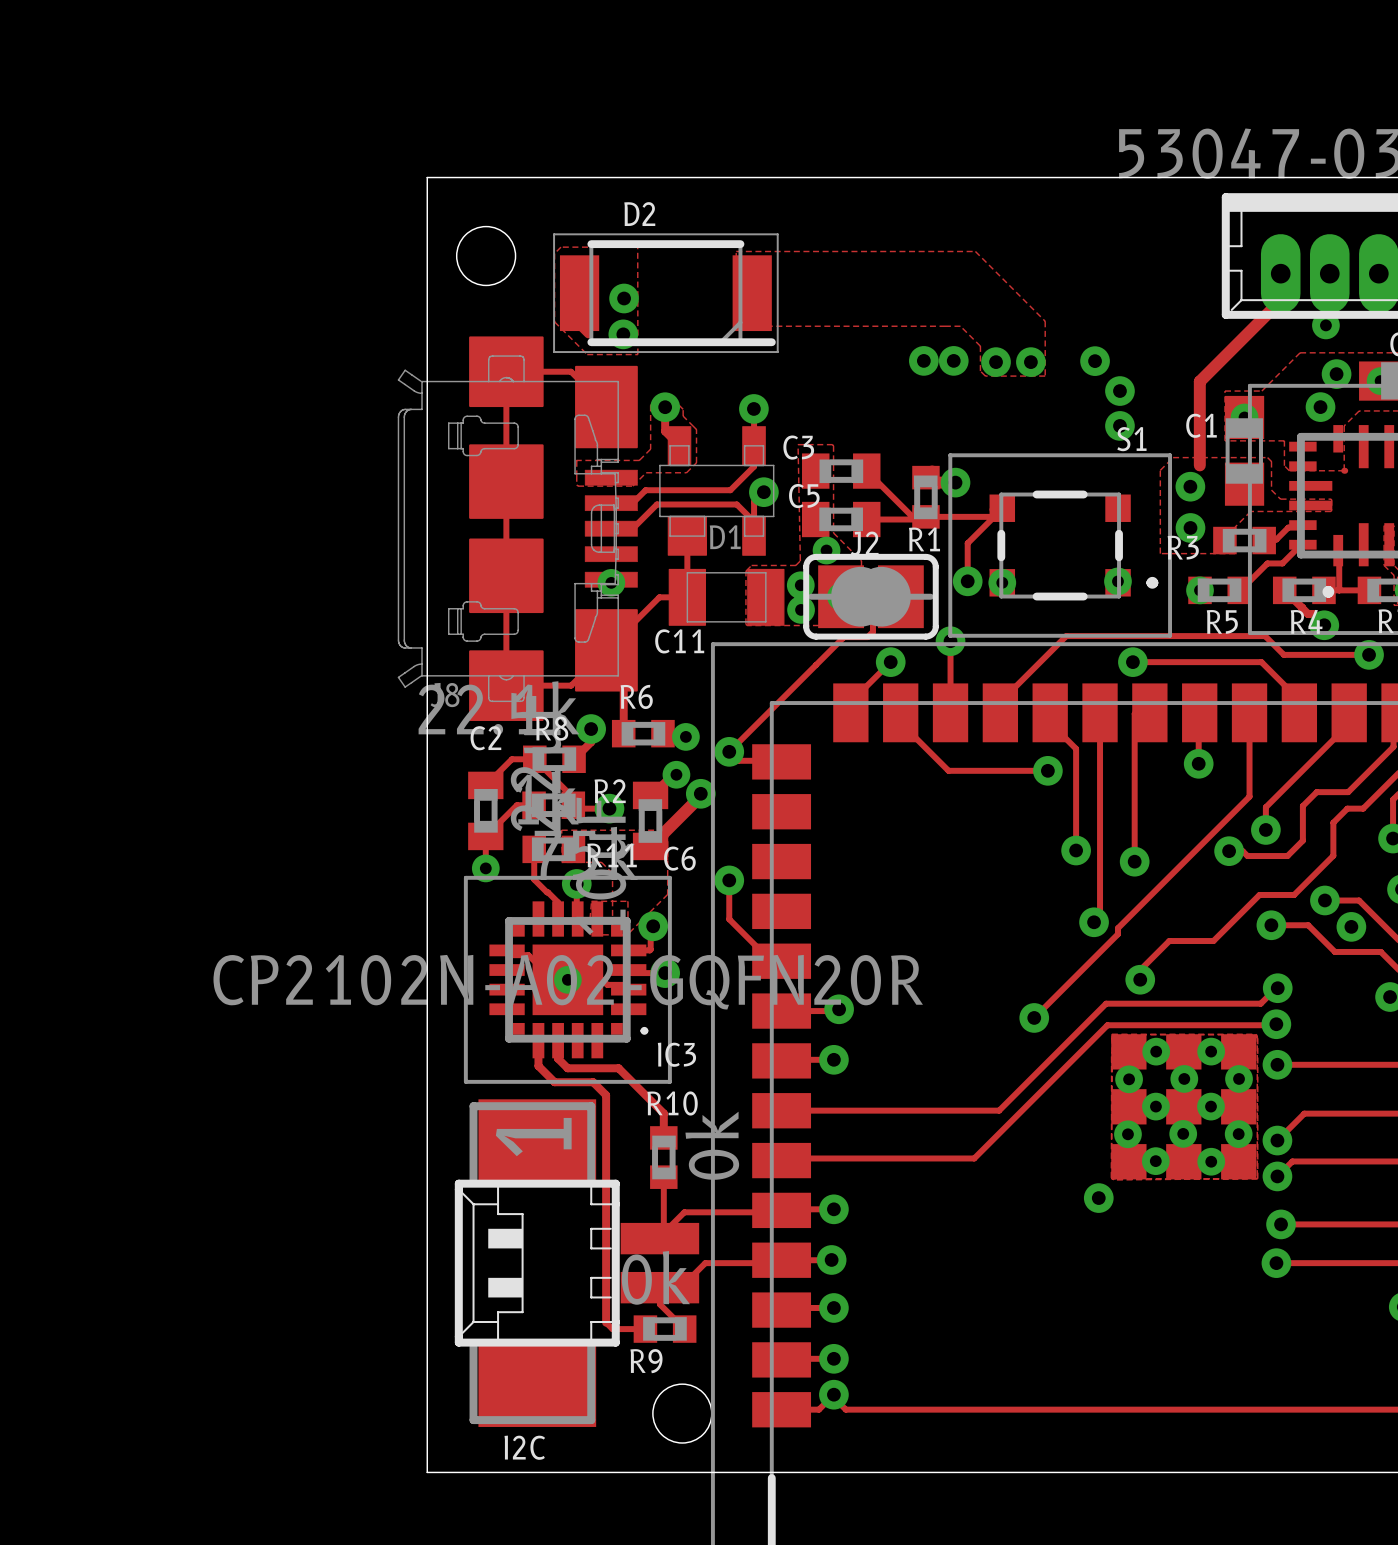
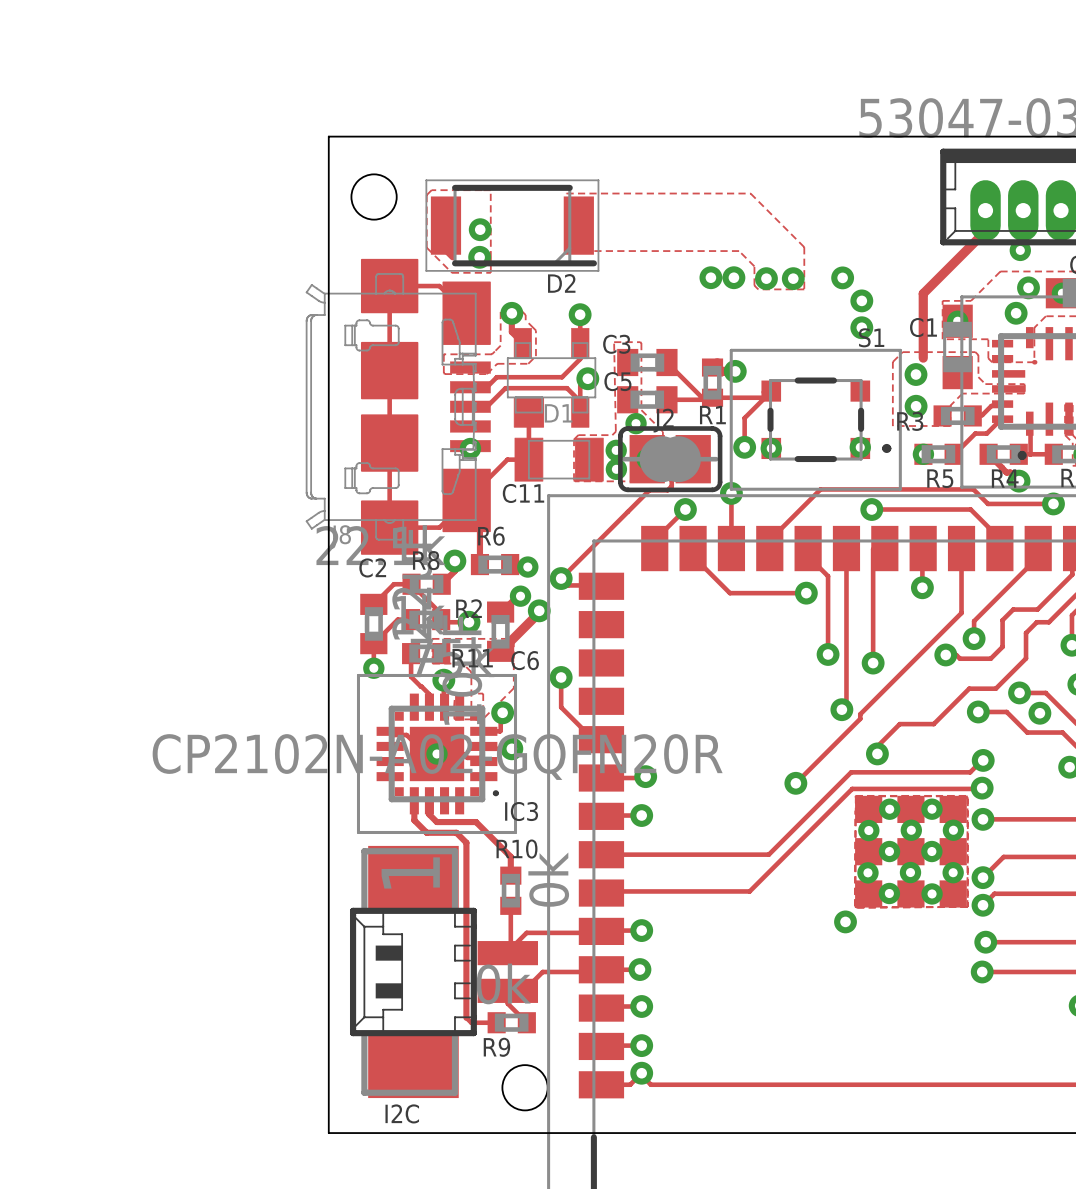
D2 name position: D2 (639, 214) -> D2 (561, 283)

